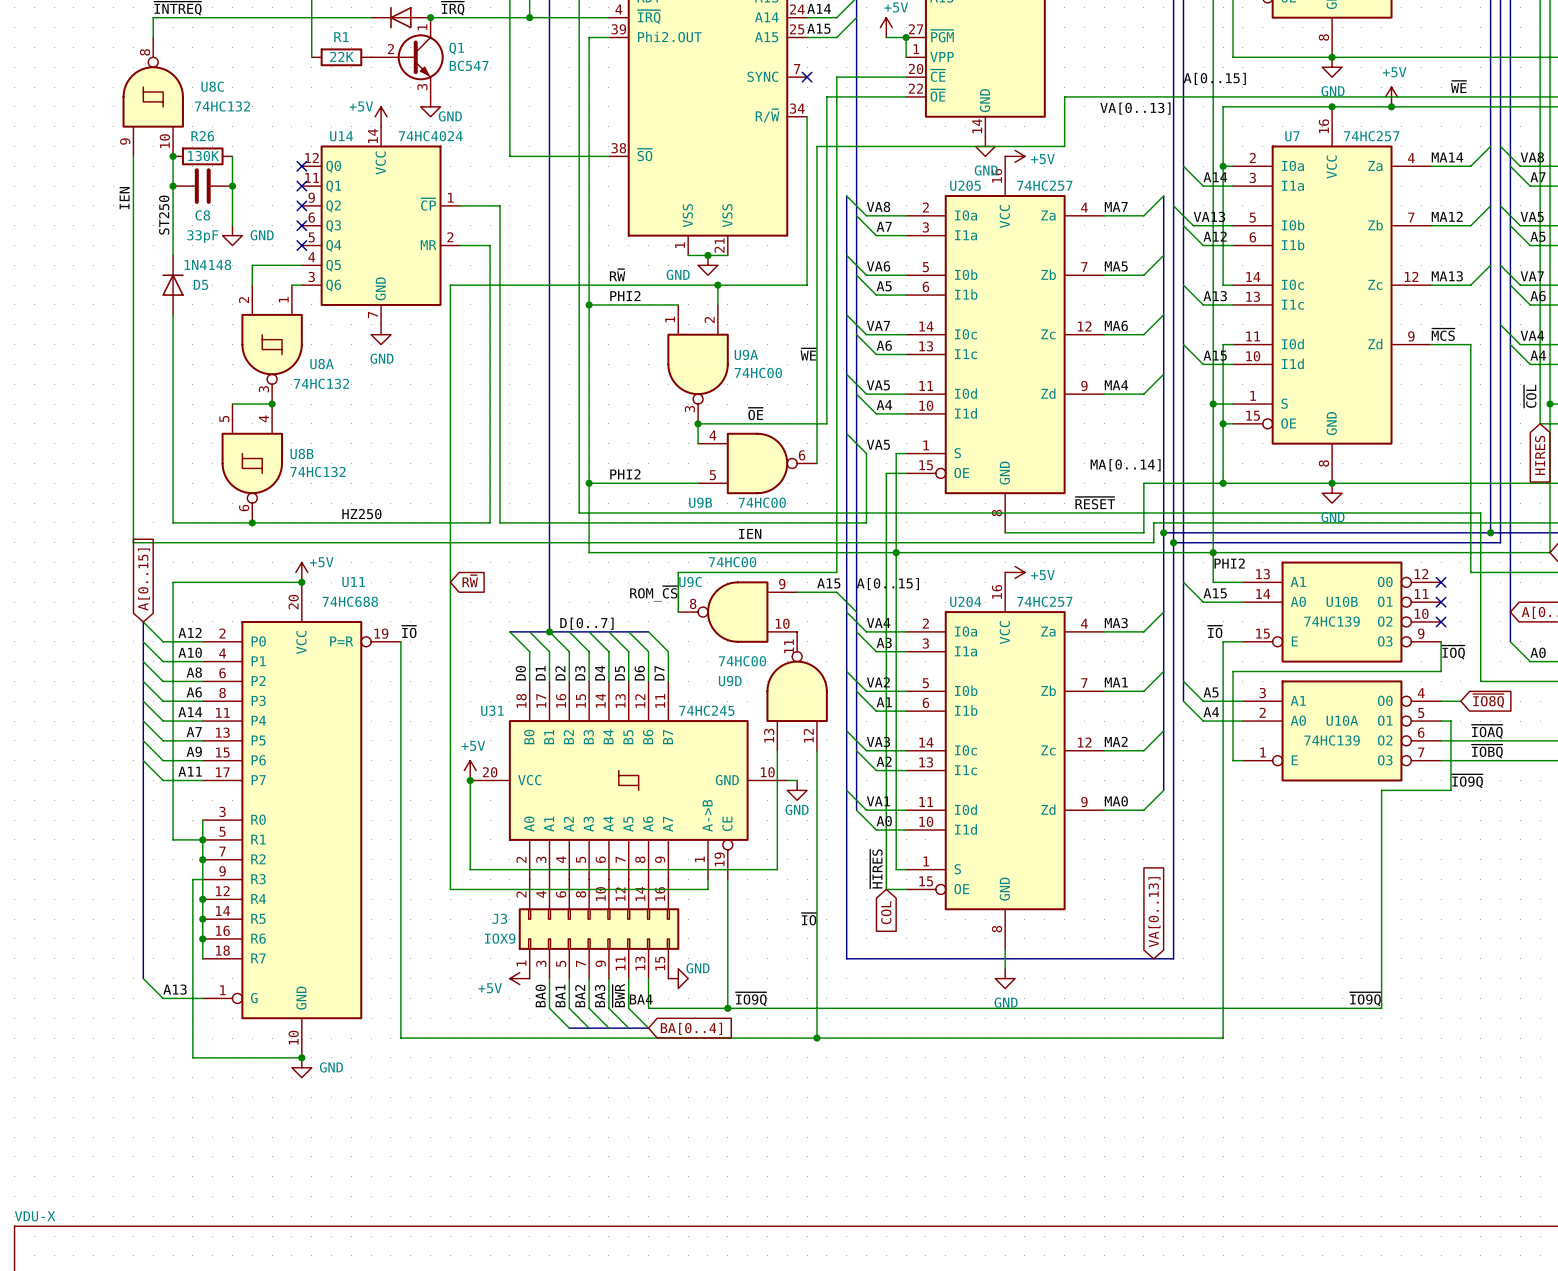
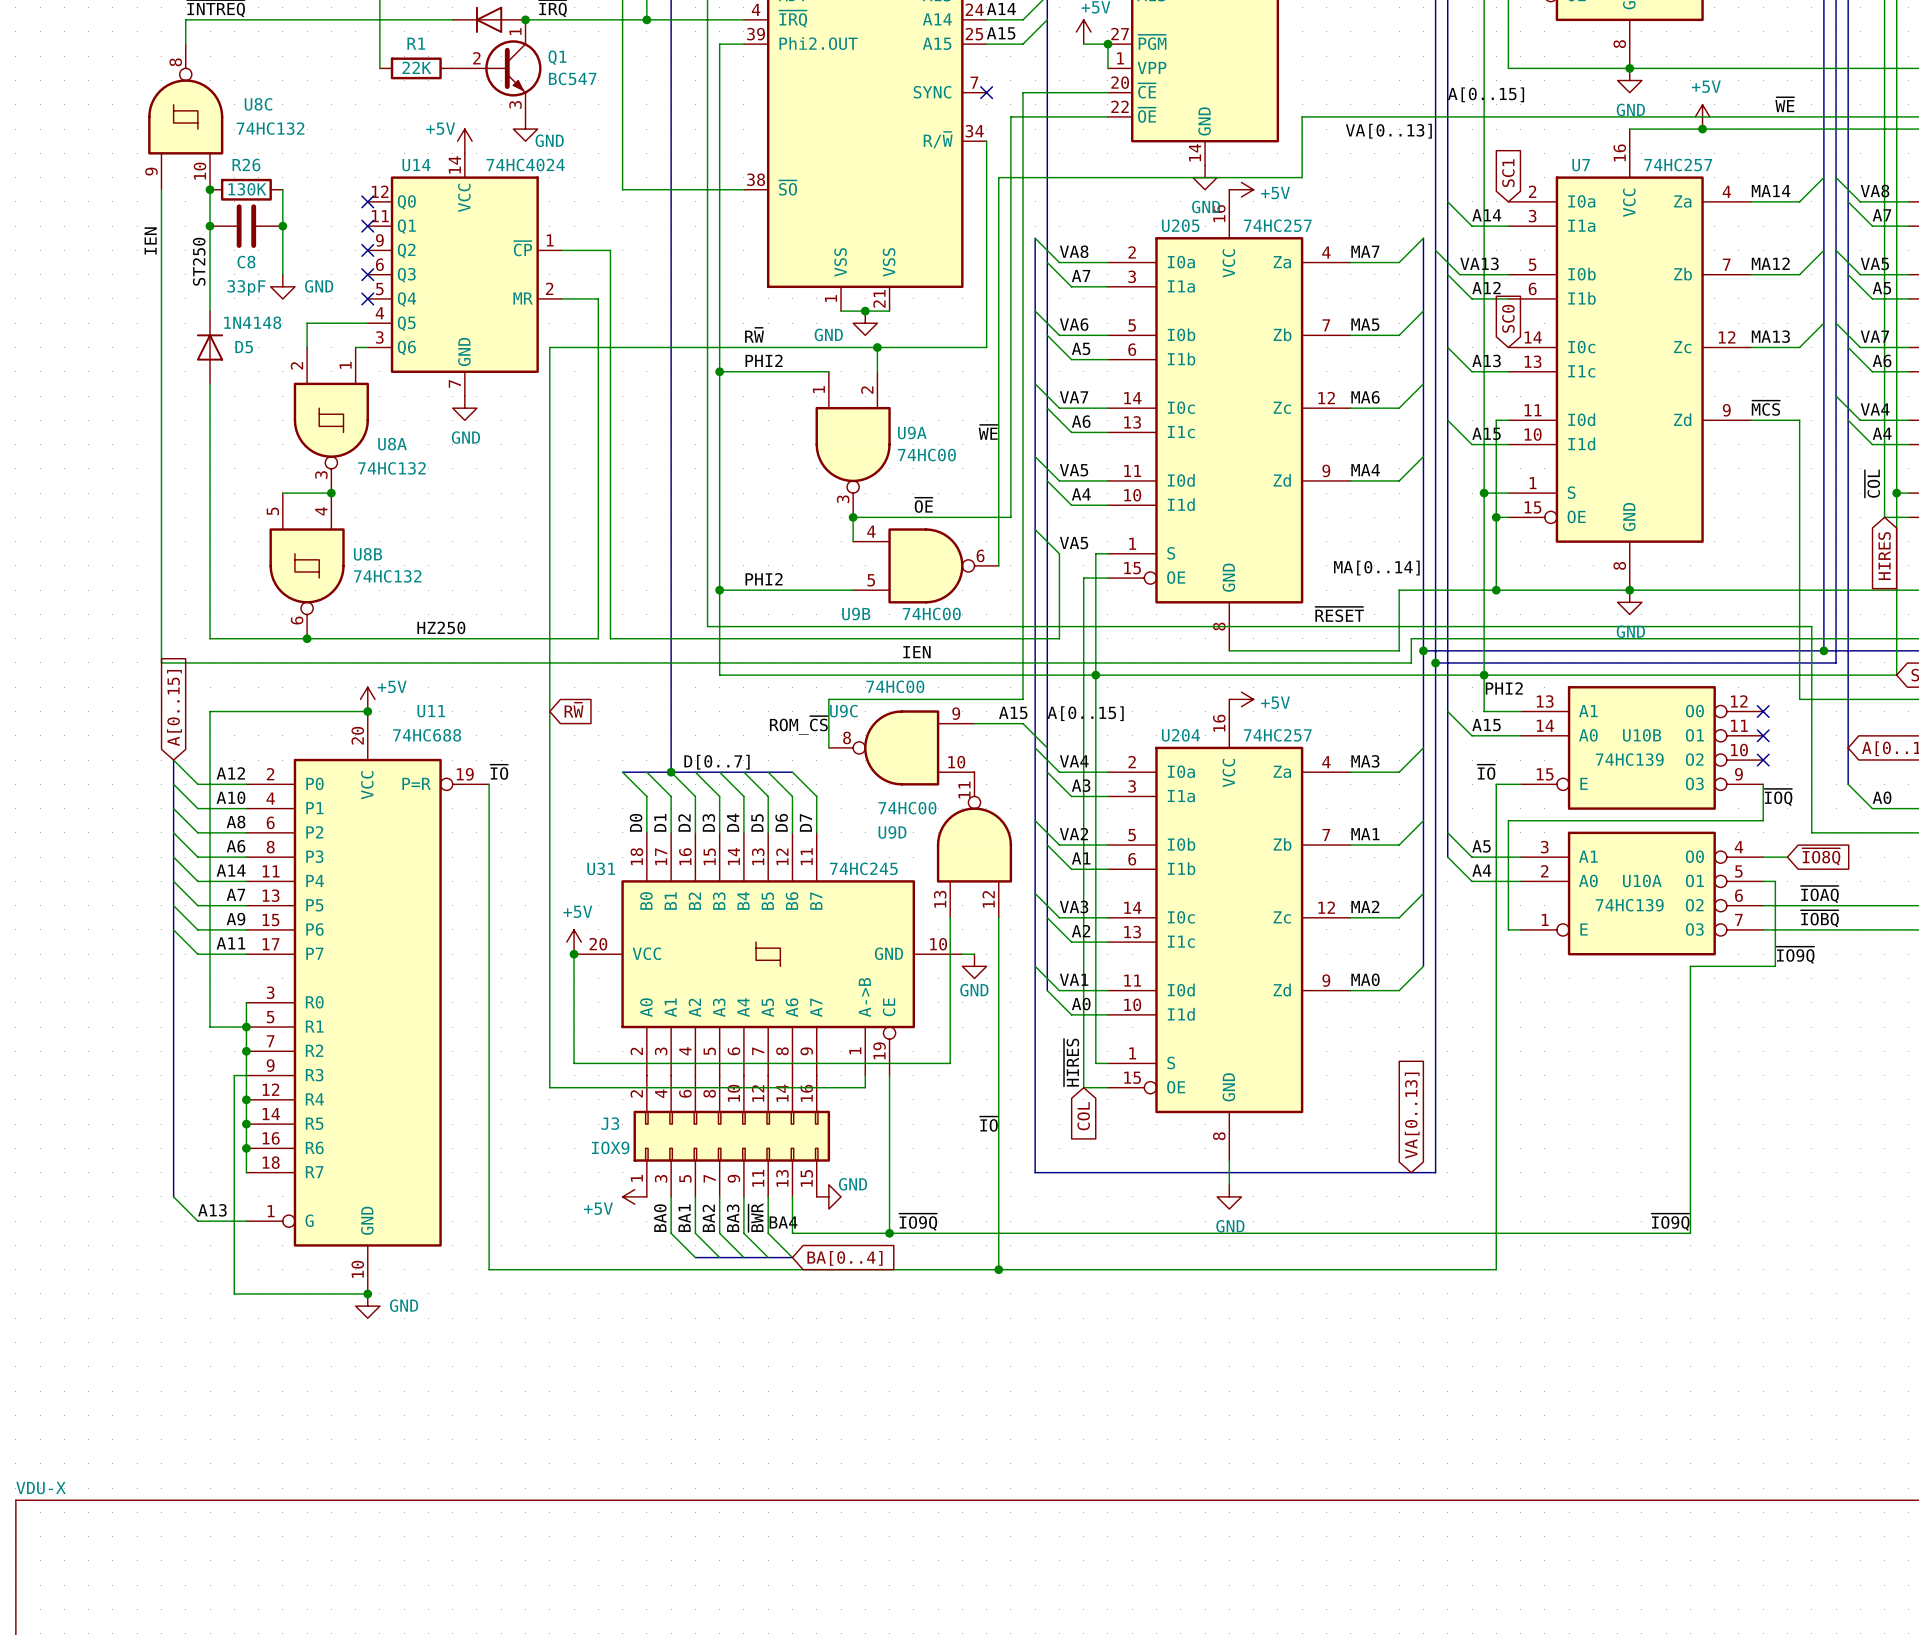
wire: (1332, 106) (1223, 106) (1223, 285) (1233, 285) -> none
junction: (1332, 106) -> none
global label: none -> SC1 (1508, 173)
wire: (1223, 166) (1233, 166) -> none
junction: (1223, 166) -> none
global label: none -> SC0 (1508, 318)

